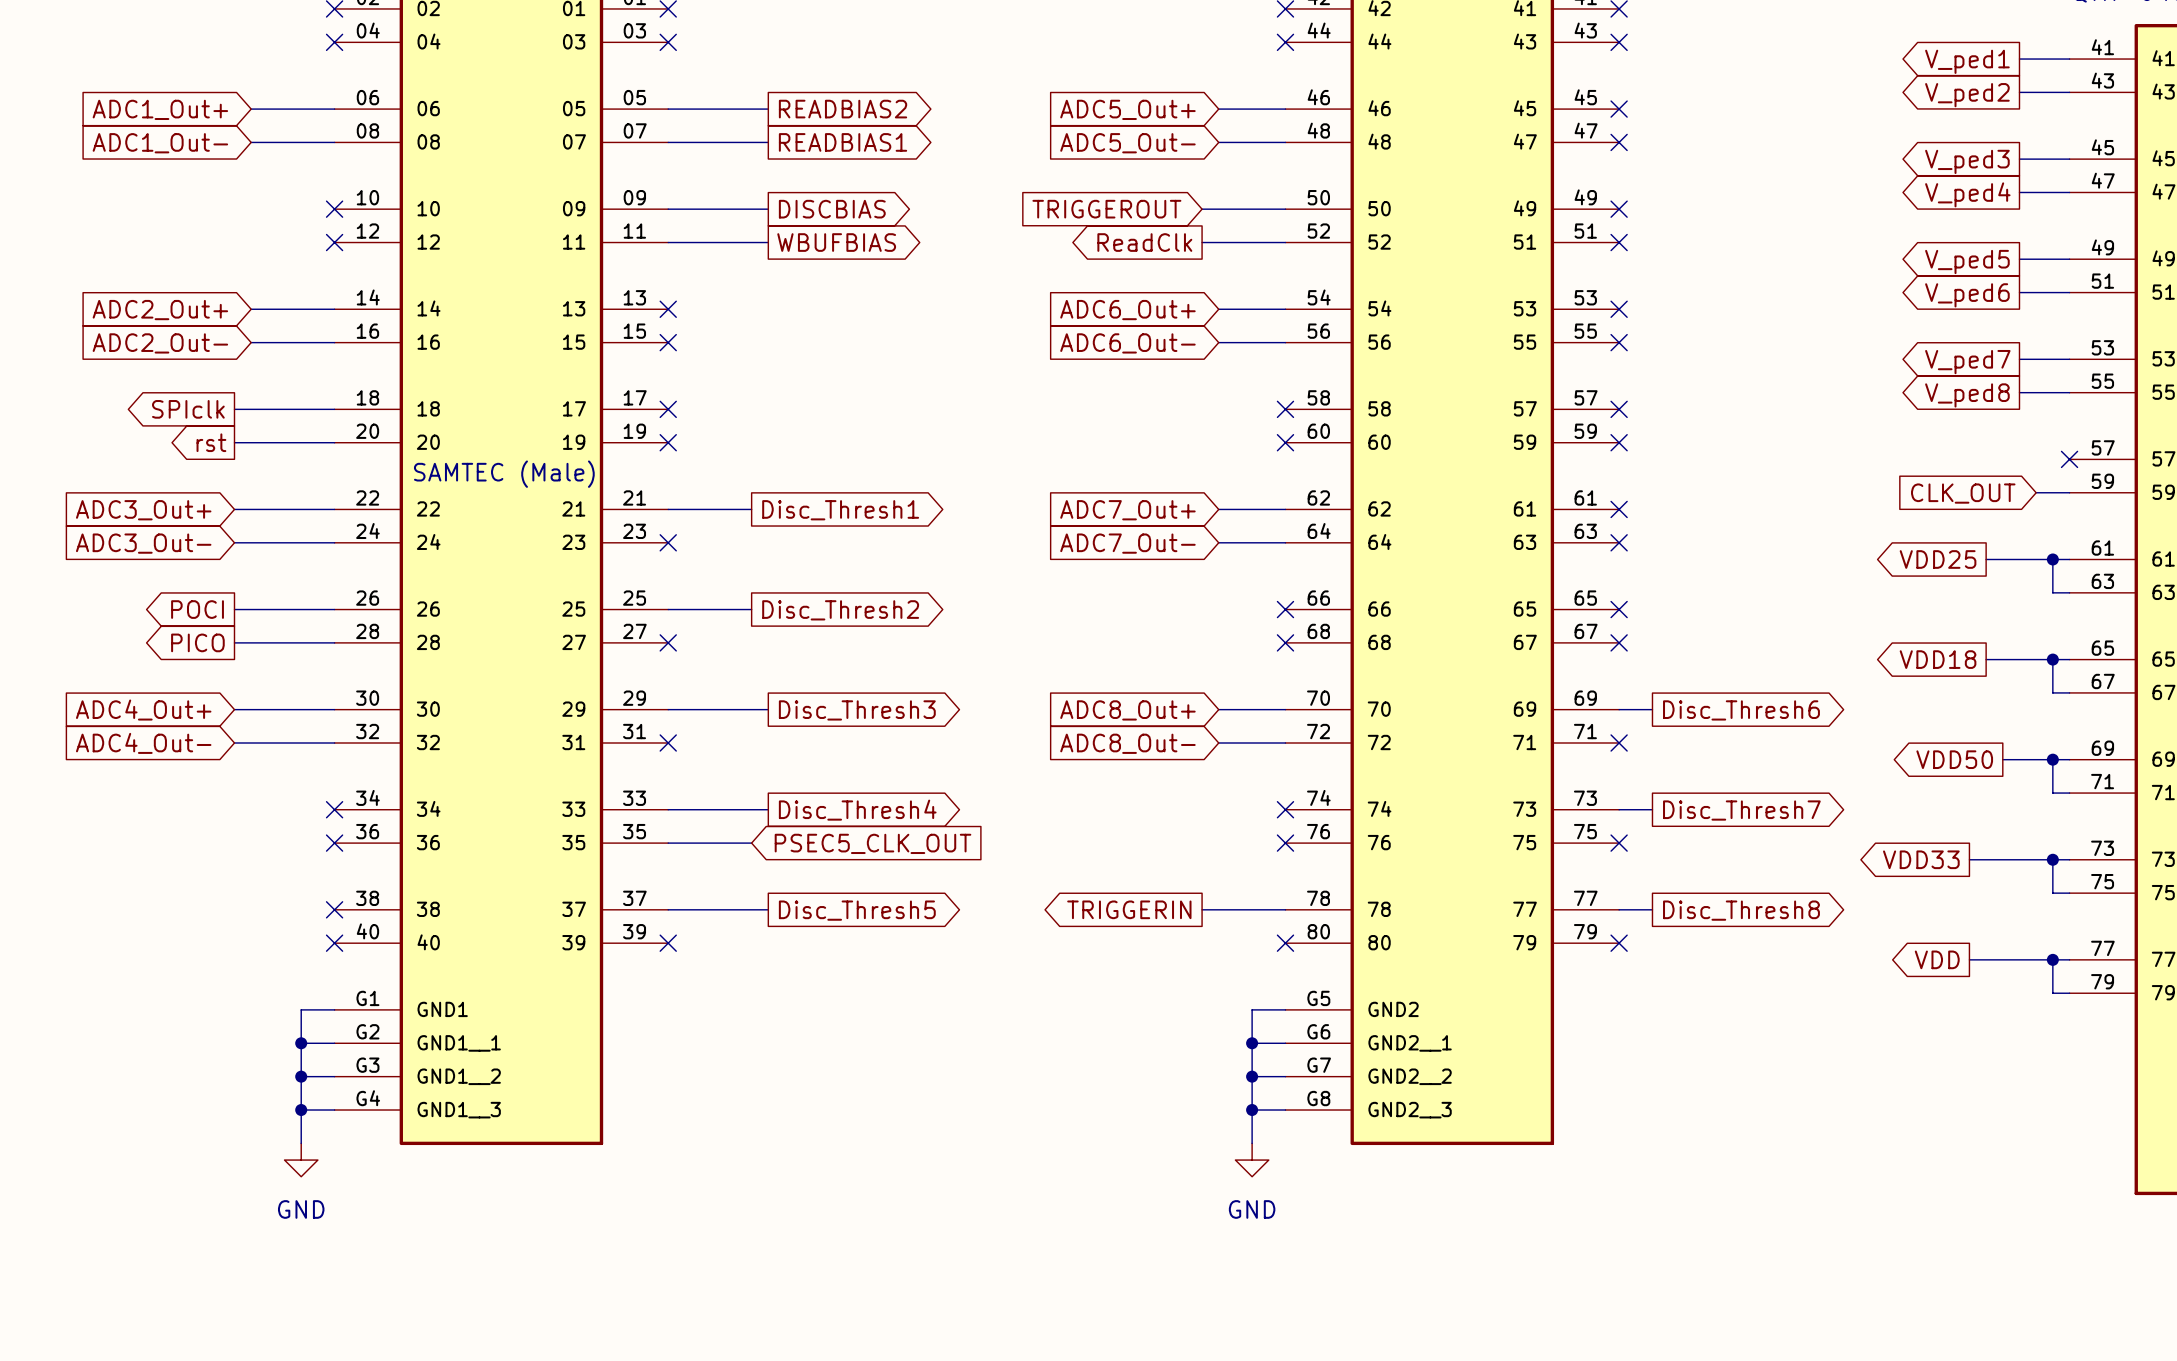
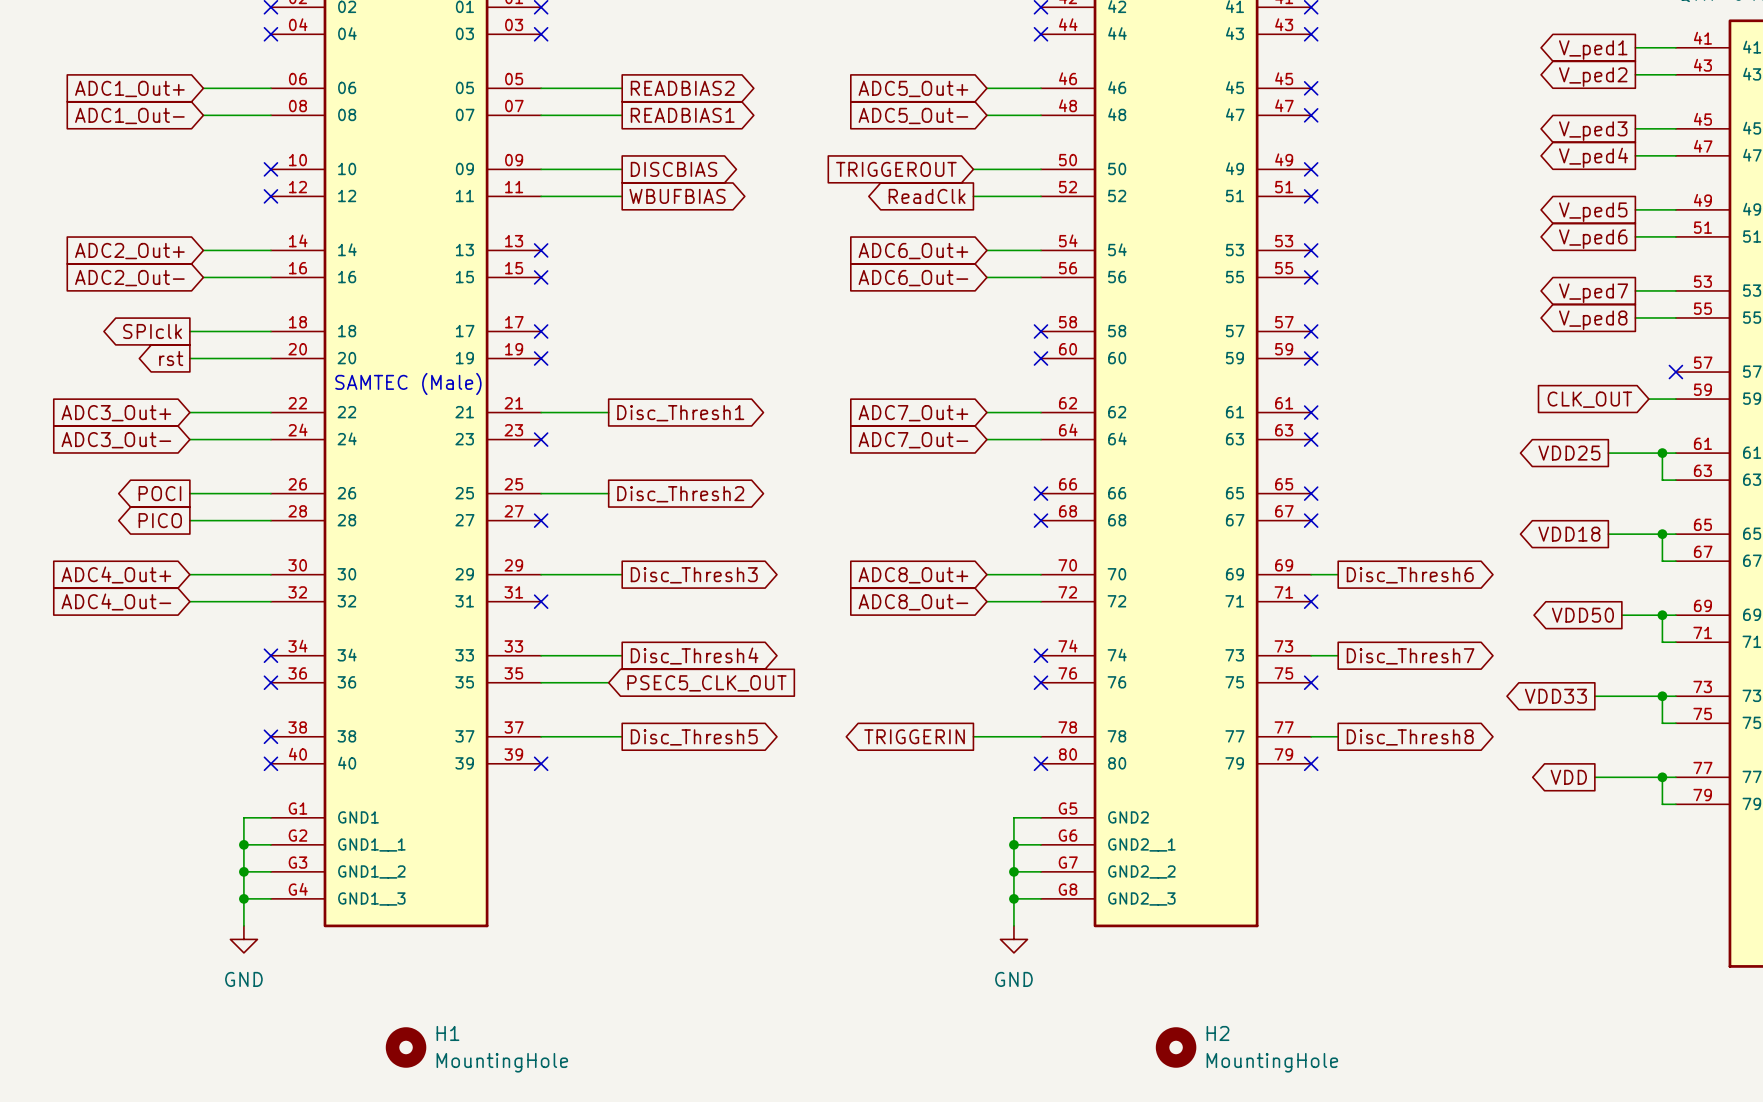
H1: none -> MountingHole (406, 1047)
H2: none -> MountingHole (1176, 1047)

